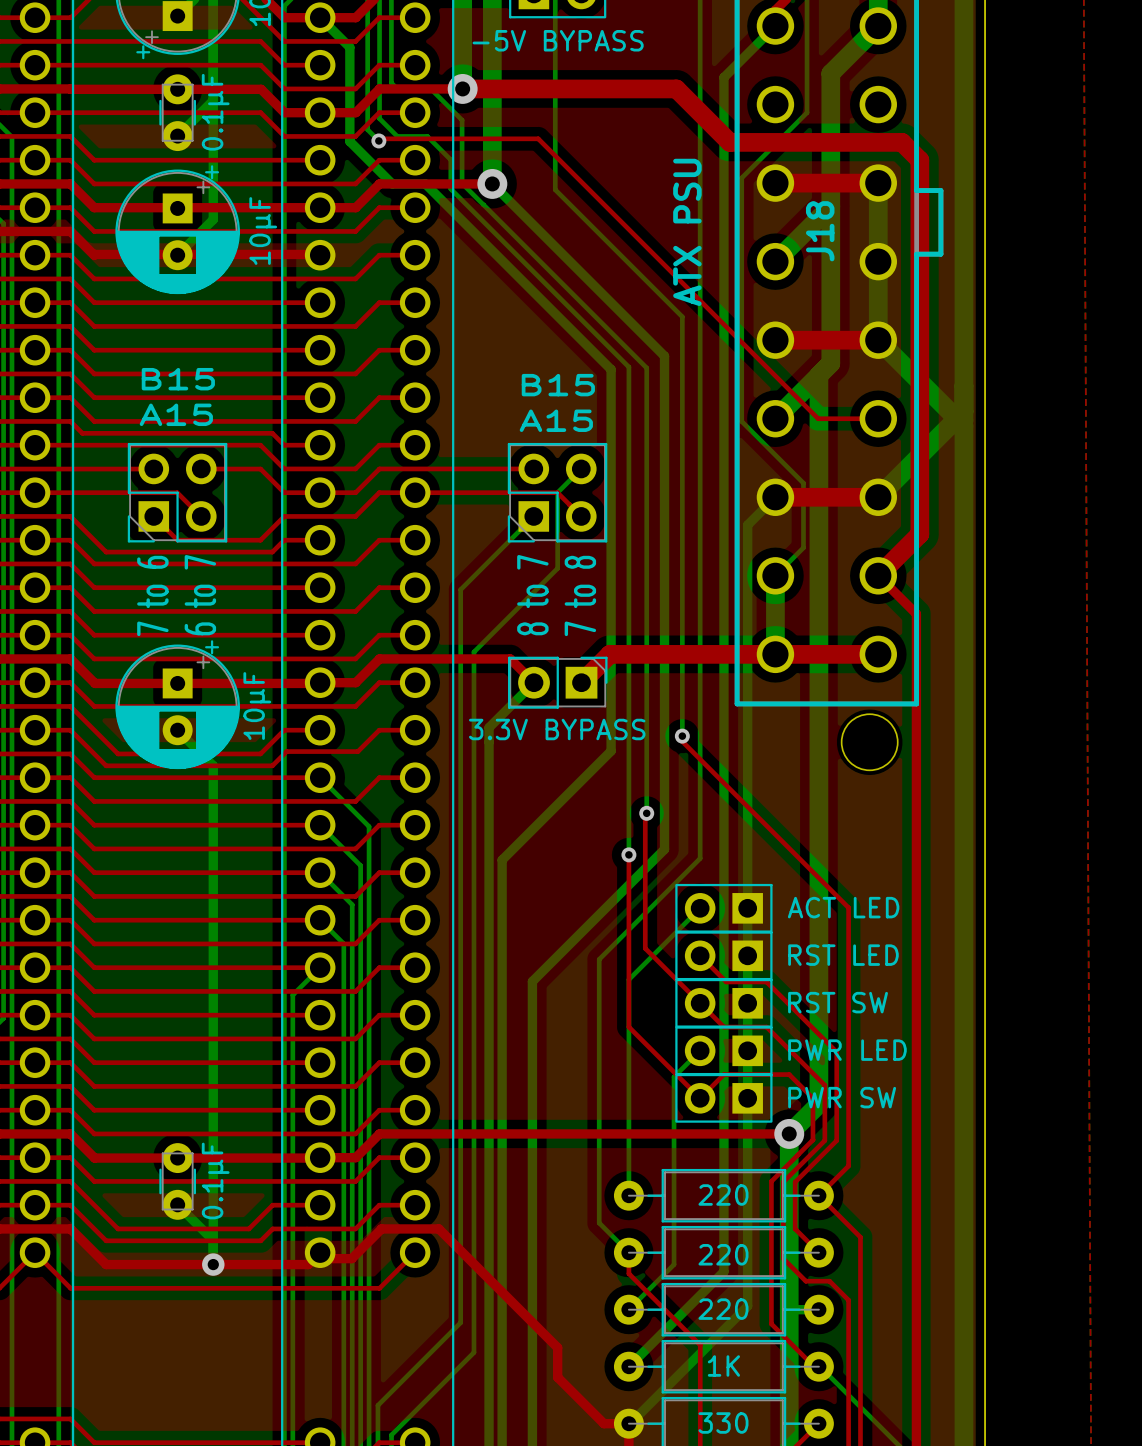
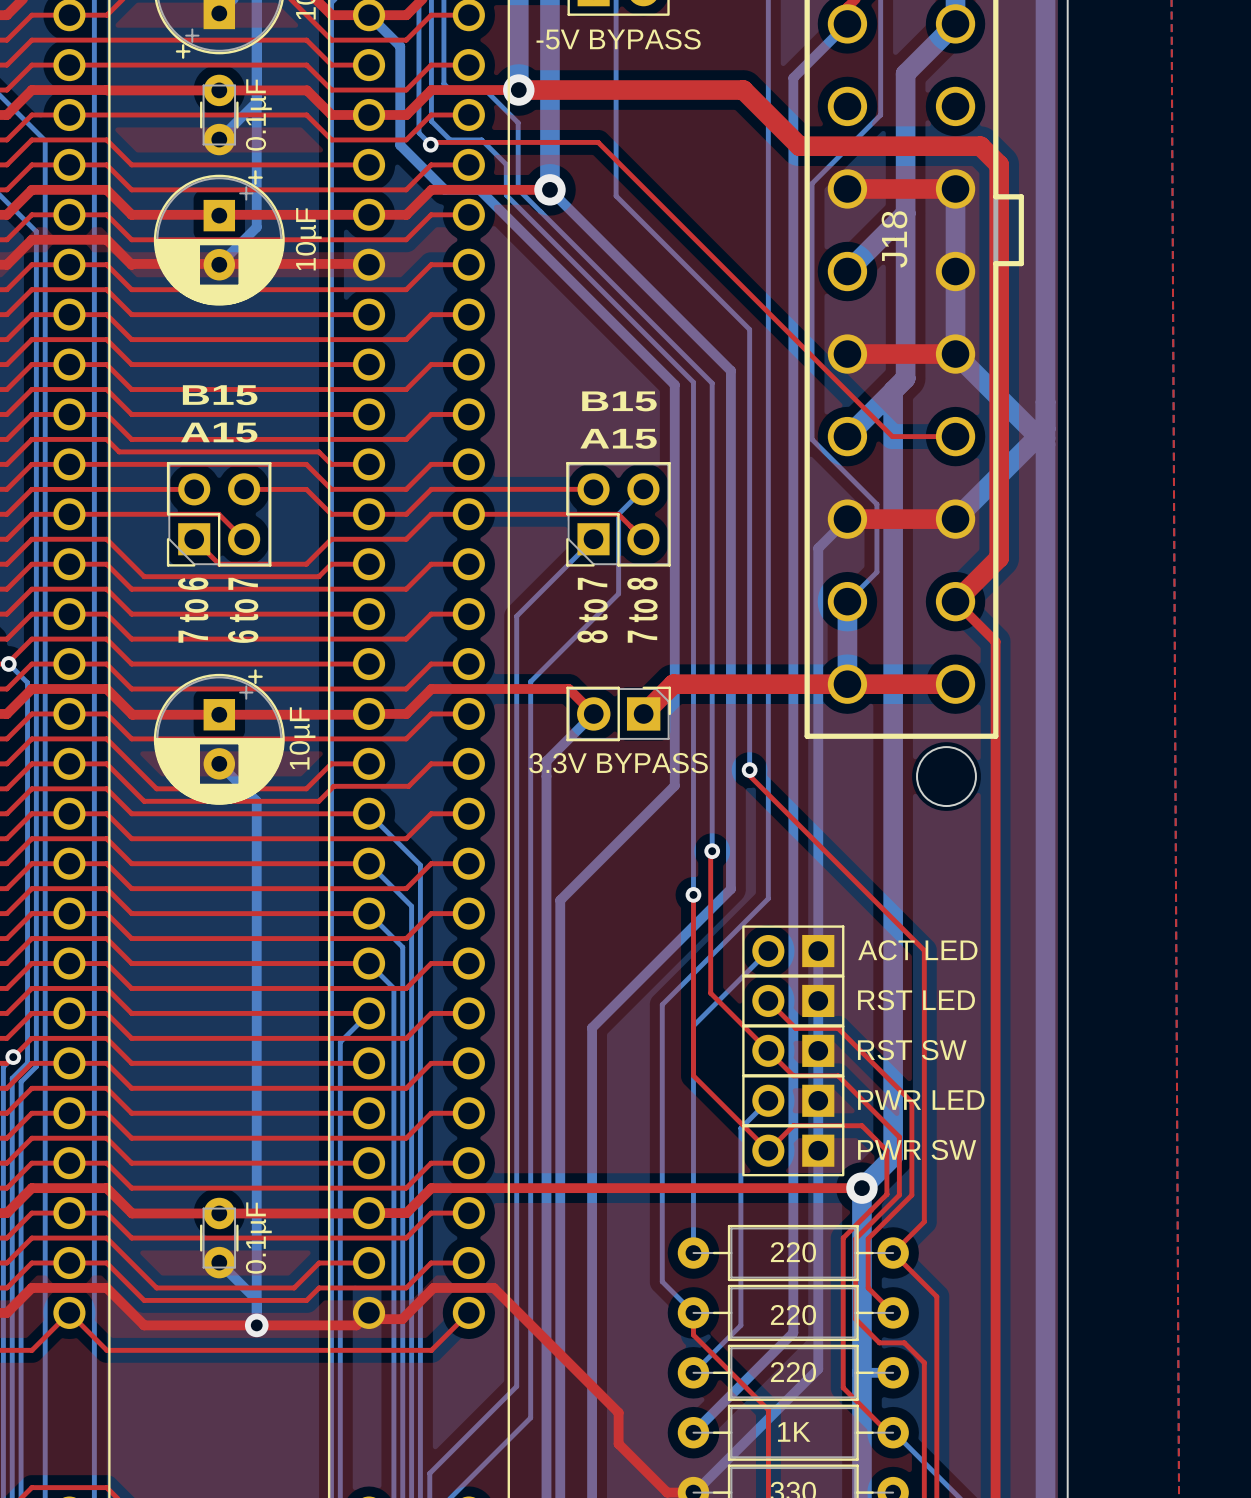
J18 value: ATX PSU (687, 232) -> none

